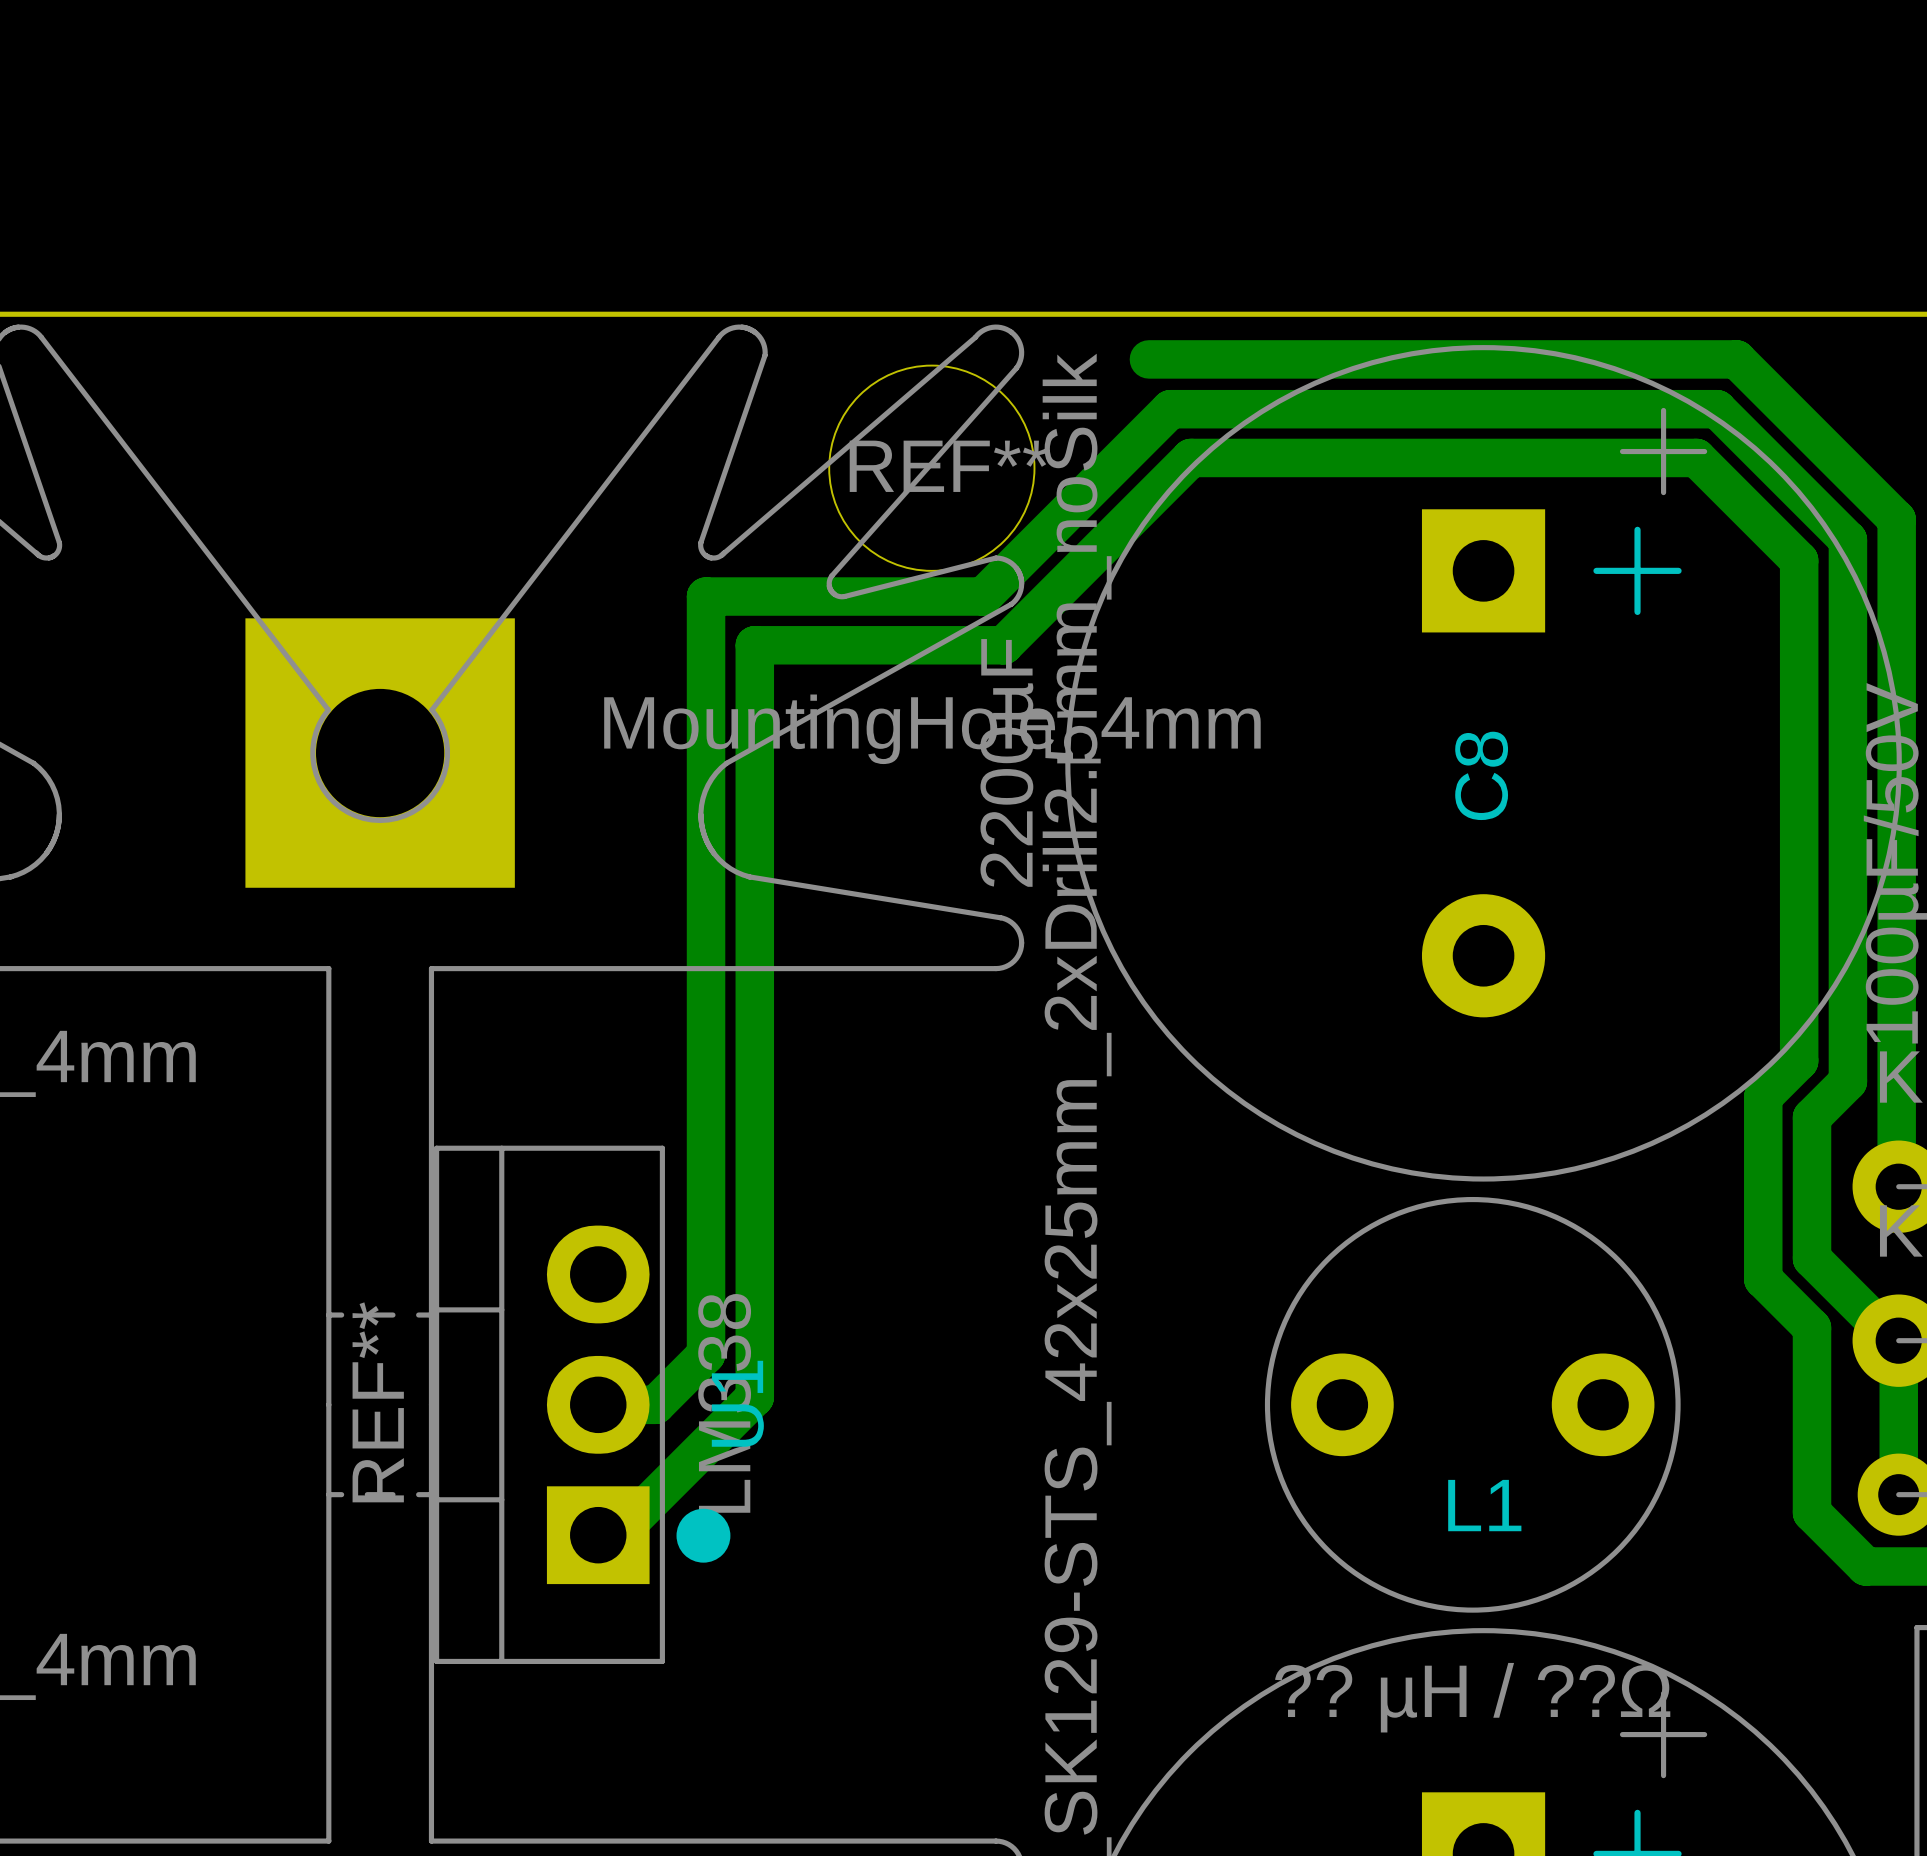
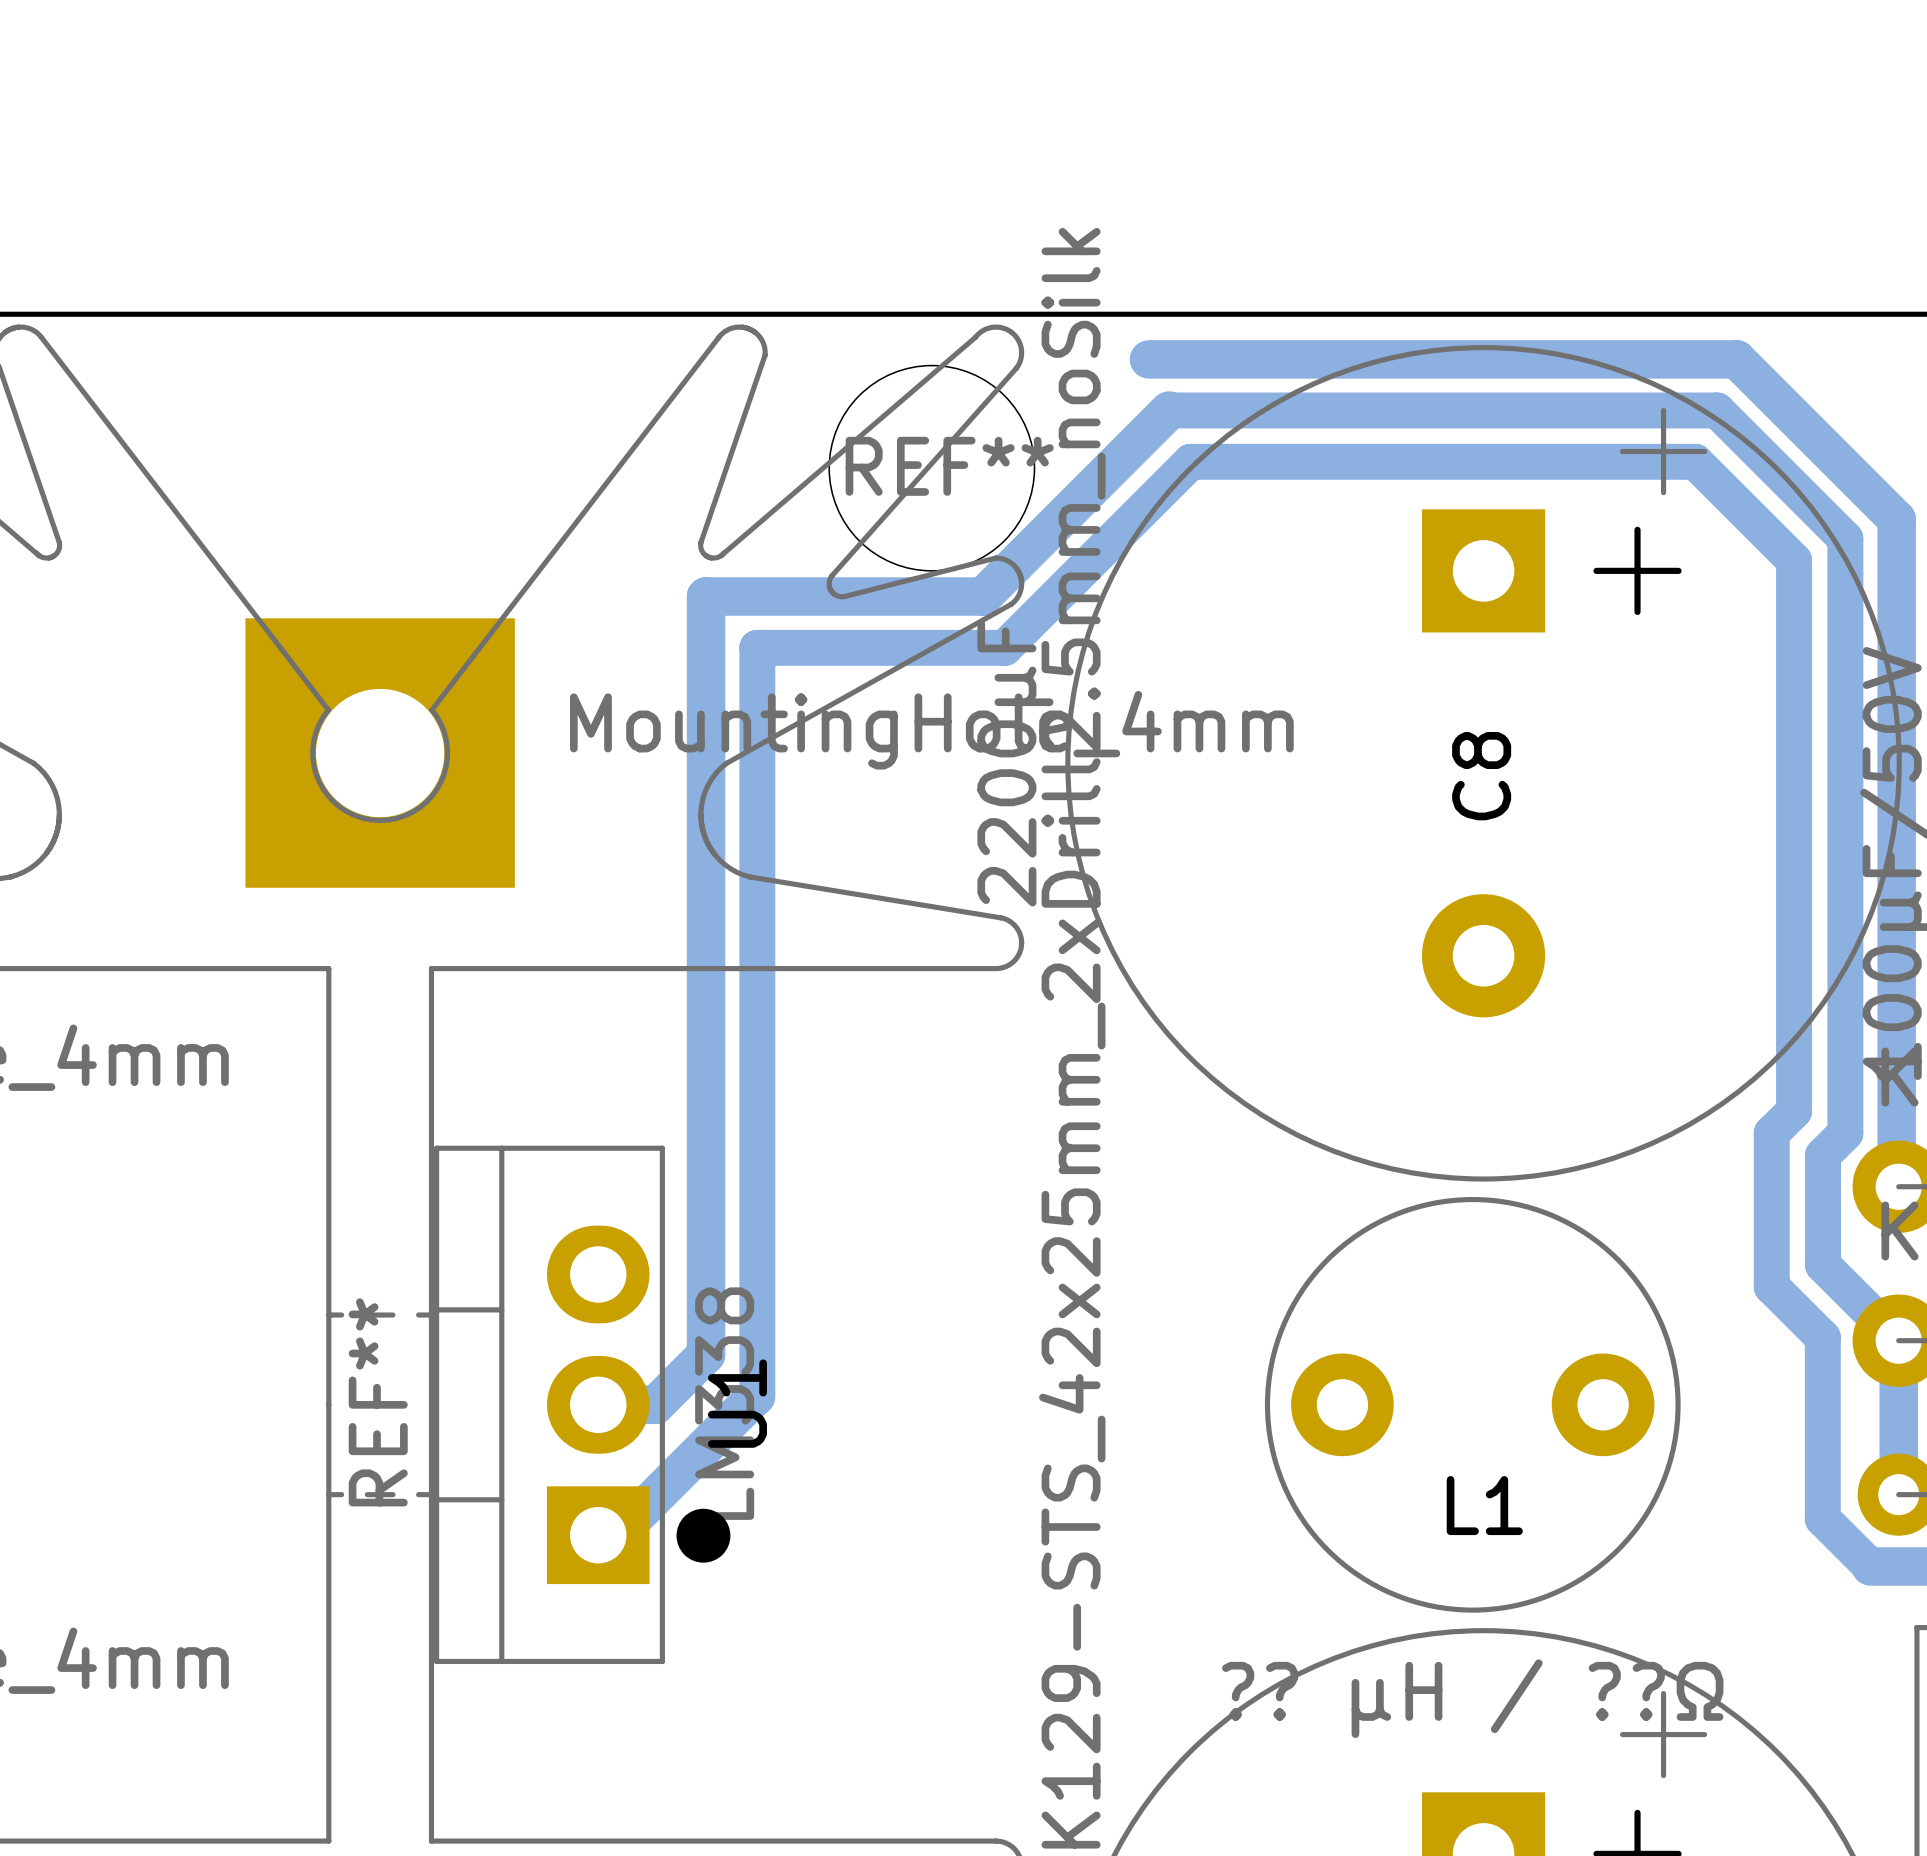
bottom track: (1169, 410) (1717, 409) (1847, 540) (1847, 1081) (1812, 1117) (1812, 1258) (1894, 1340) -> (1169, 410) (1717, 410) (1845, 538) (1845, 1133) (1823, 1155) (1823, 1264) (1898, 1340)
bottom track: (754, 1397) (754, 645) (1003, 645) (1191, 457) (1696, 457) (1799, 560) (1799, 1060) (1763, 1096) (1763, 1279) (1812, 1327) (1812, 1512) (1865, 1566) (1870, 1566) -> (757, 1397) (757, 647) (1004, 647) (1190, 461) (1695, 461) (1794, 560) (1794, 1111) (1771, 1133) (1771, 1286) (1822, 1337) (1822, 1518) (1870, 1566)

